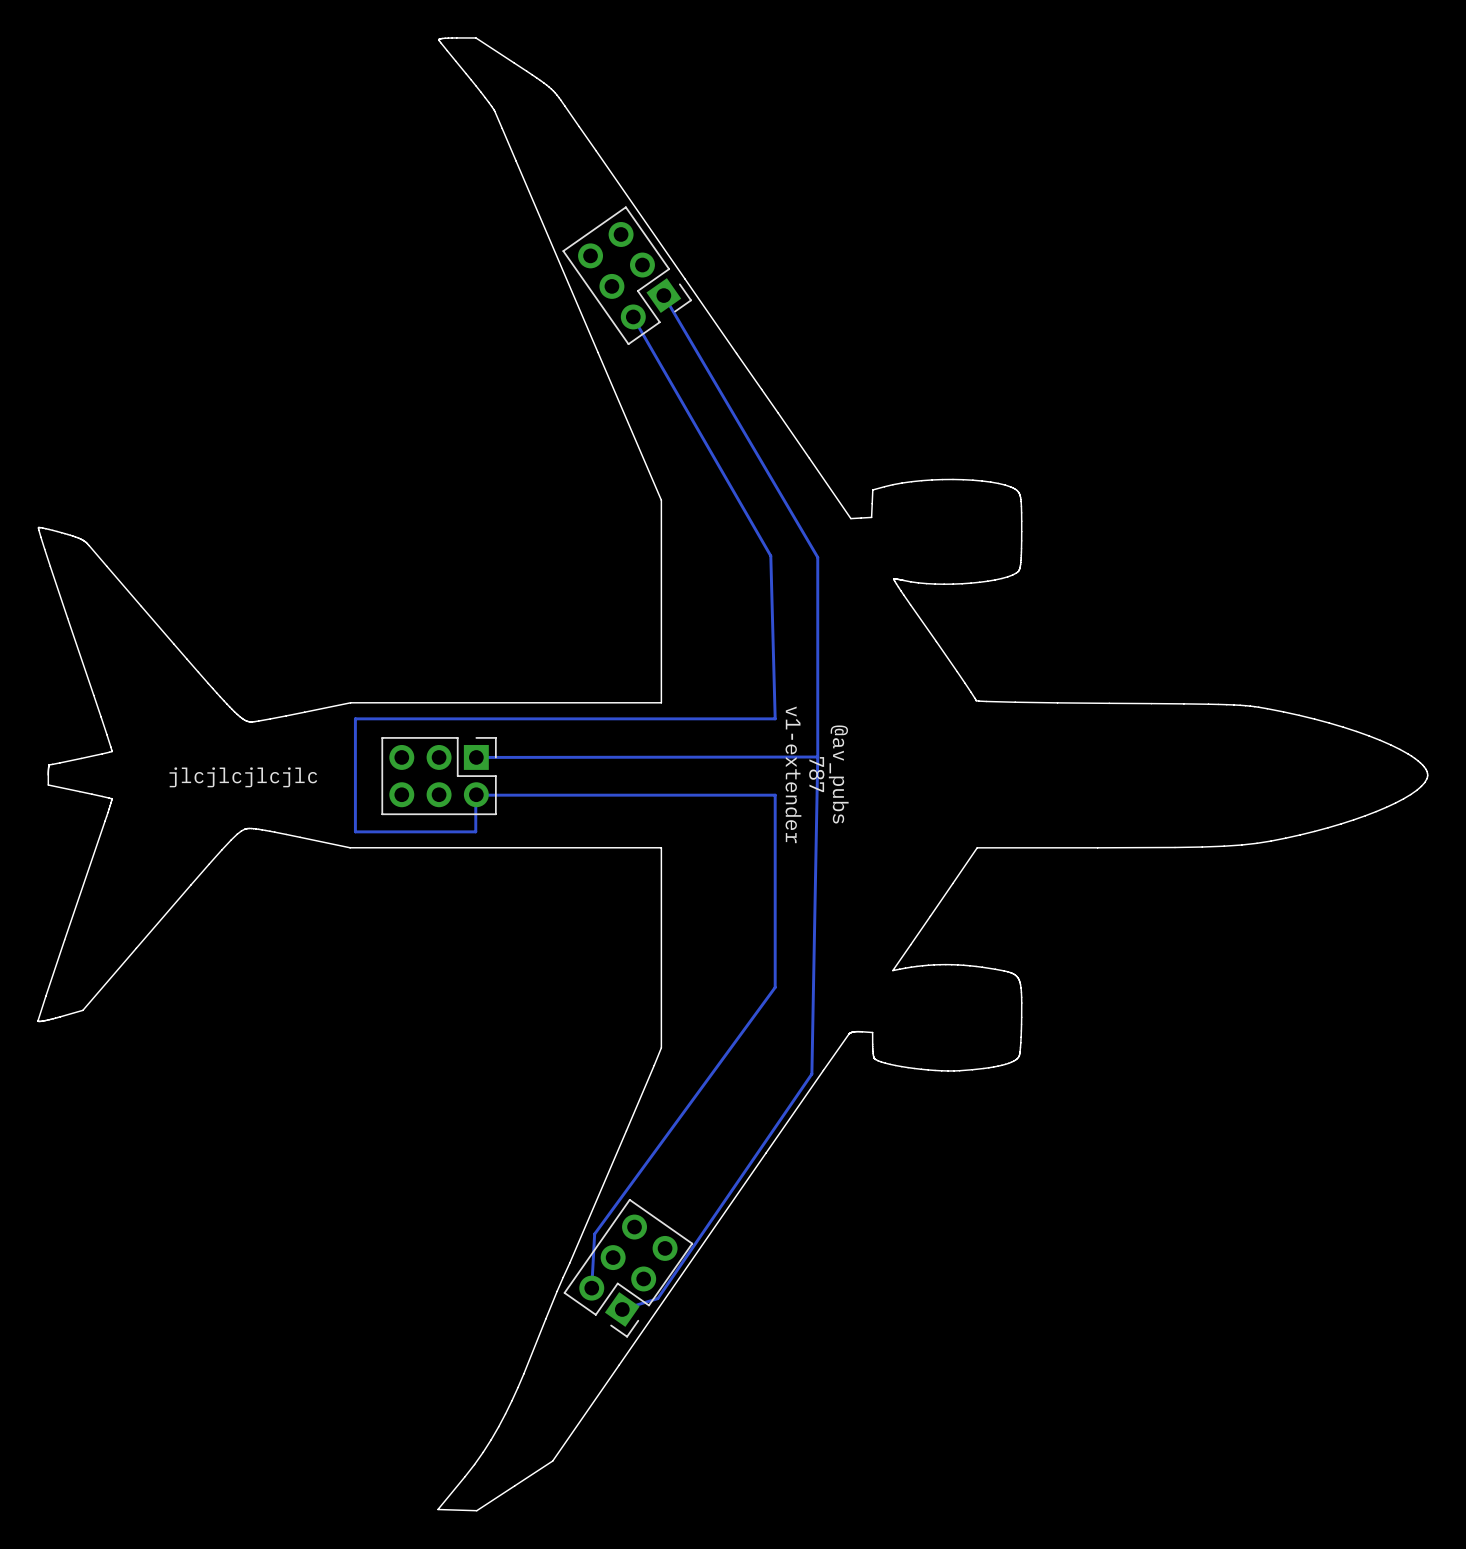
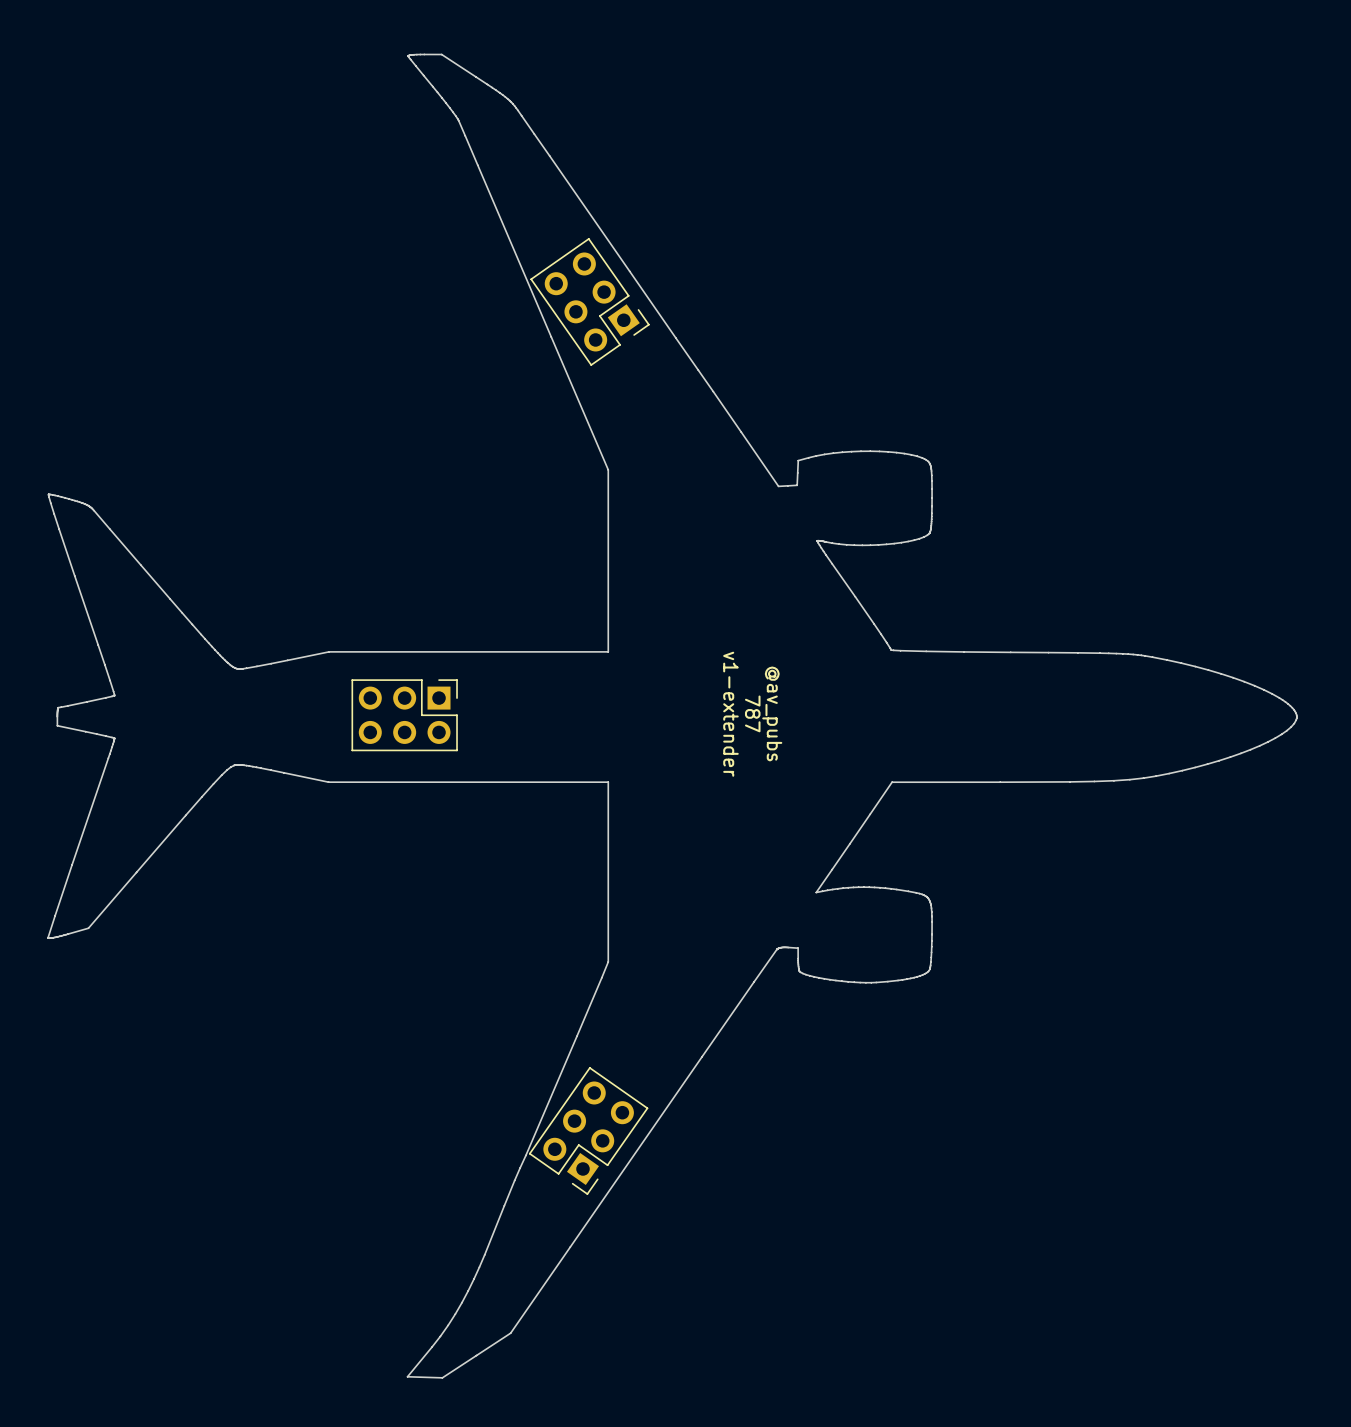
board edge: (438, 39) (476, 37) (540, 80) (555, 93) (850, 518) (871, 517) (872, 489) (902, 483) (932, 479) (972, 480) (1005, 485) (1018, 492) (1021, 506) (1021, 552) (1020, 567) (1016, 573) (995, 579) (962, 583) (926, 583) (894, 579) -> none
board edge: (438, 40) (494, 111) (661, 500) (661, 702) (350, 702) (270, 718) (247, 721) (236, 713) (216, 692) (86, 542) (73, 536) (38, 527) -> none
board edge: none -> (408, 55) (441, 54) (499, 92) (513, 104) (778, 486) (797, 485) (798, 460) (824, 454) (851, 451) (888, 451) (917, 456) (929, 462) (931, 475) (931, 516) (930, 530) (927, 535) (908, 541) (878, 544) (846, 544) (817, 540)
board edge: none -> (408, 56) (458, 120) (608, 469) (608, 651) (329, 651) (236, 668) (226, 661) (208, 642) (91, 508) (79, 502) (48, 494)
part position: (627, 275) -> (590, 301)
track: (663, 295) (817, 557) (817, 757) -> none
track: (632, 316) (770, 555) (775, 718) (355, 718) (355, 831) (475, 831) (475, 795) (775, 795) (775, 987) (594, 1234) (591, 1288) -> none
board edge: (38, 527) (112, 751) (49, 764) -> none
board edge: none -> (48, 494) (114, 695) (58, 707)
board edge: (893, 579) (976, 700) (1218, 704) (1258, 707) (1329, 723) (1380, 740) (1414, 758) (1424, 767) (1427, 775) (1424, 782) (1416, 790) (1376, 811) (1328, 827) (1271, 841) (1202, 847) (977, 847) (892, 970) (922, 965) (951, 964) (982, 967) (1014, 974) (1019, 980) (1021, 992) (1021, 1037) (1018, 1057) (1001, 1065) (972, 1069) (941, 1070) (908, 1067) (874, 1058) (872, 1032) (849, 1033) -> none
board edge: none -> (817, 541) (891, 650) (1108, 653) (1145, 655) (1208, 670) (1254, 685) (1285, 701) (1293, 709) (1296, 716) (1294, 723) (1286, 730) (1250, 749) (1207, 764) (1156, 776) (1094, 781) (892, 782) (816, 892) (843, 888) (869, 887) (896, 889) (925, 895) (929, 901) (931, 911) (931, 952) (929, 970) (914, 977) (887, 981) (860, 982) (829, 979) (800, 971) (798, 948) (778, 948)
track: (817, 757) (811, 1074) (657, 1298) (622, 1309) -> none
track: (817, 757) (476, 757) -> none
board edge: (48, 765) (48, 785) (111, 798) -> none
board edge: none -> (57, 708) (57, 725) (114, 738)
text: jlcjlcjlcjlc (243, 777) -> none
board edge: (111, 799) (37, 1020) -> none
board edge: none -> (114, 738) (48, 937)
board edge: none -> (48, 938) (88, 928) (213, 783) (234, 765) (252, 766) (328, 782) (608, 782) (608, 961) (473, 1279) (448, 1325) (407, 1376) (442, 1377) (510, 1333) (776, 949)
board edge: (38, 1021) (82, 1010) (222, 849) (237, 834) (245, 828) (265, 830) (350, 847) (661, 847) (661, 1047) (511, 1400) (483, 1452) (437, 1509) (476, 1510) (552, 1461) (848, 1034) -> none
part position: (628, 1268) -> (588, 1130)

